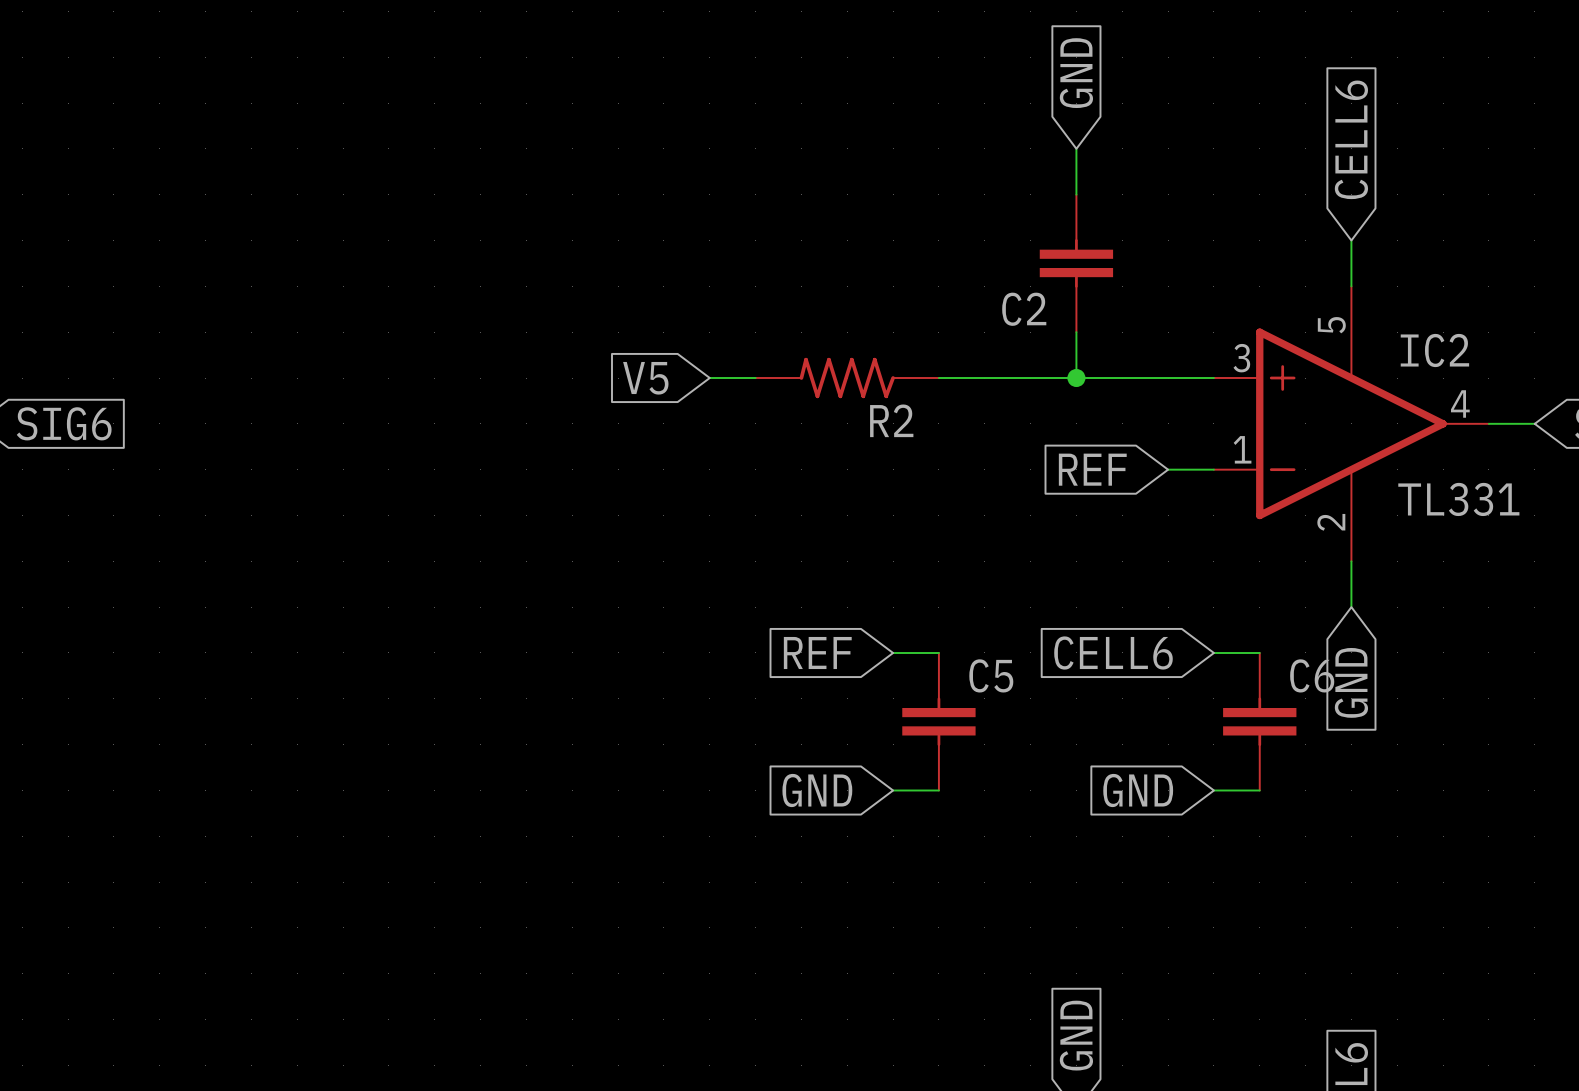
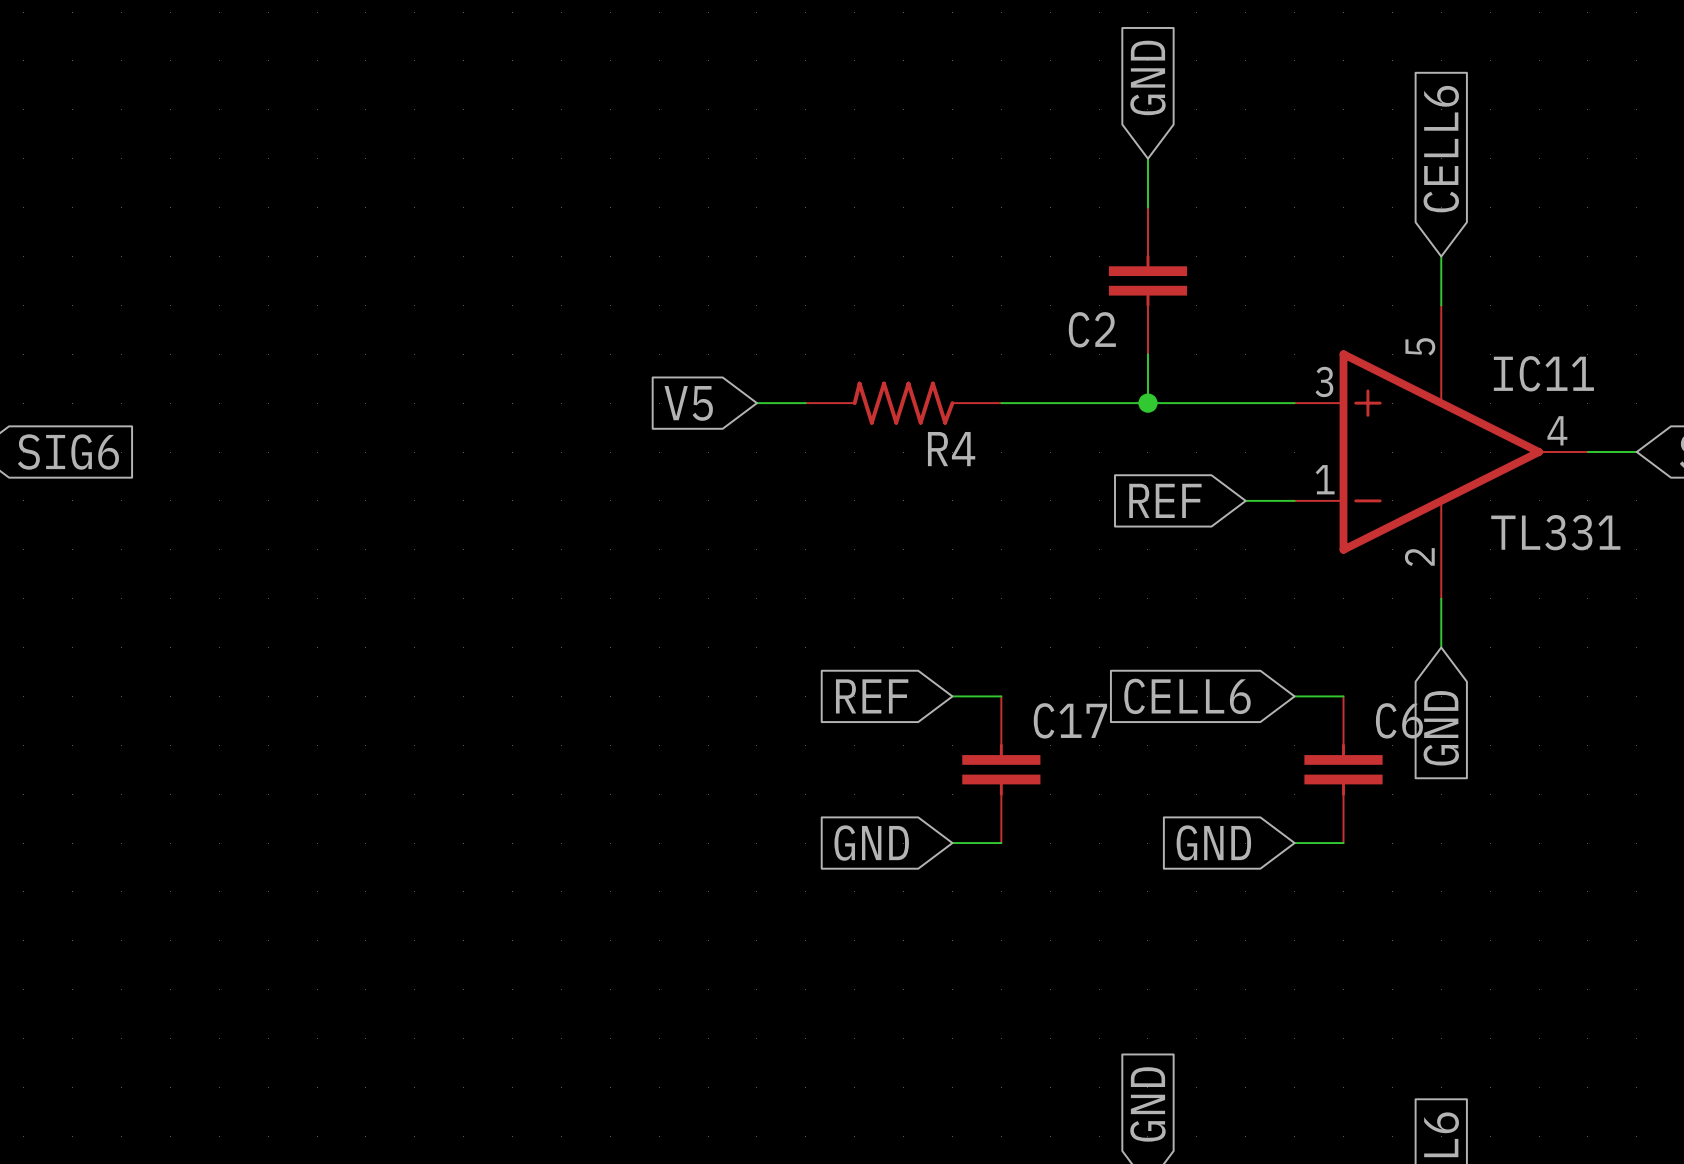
IC2 name: IC2 (1434, 350) -> IC11 (1543, 373)
R2 name: R2 (891, 420) -> R4 (951, 449)
C5 name: C5 (991, 675) -> C17 (1070, 720)

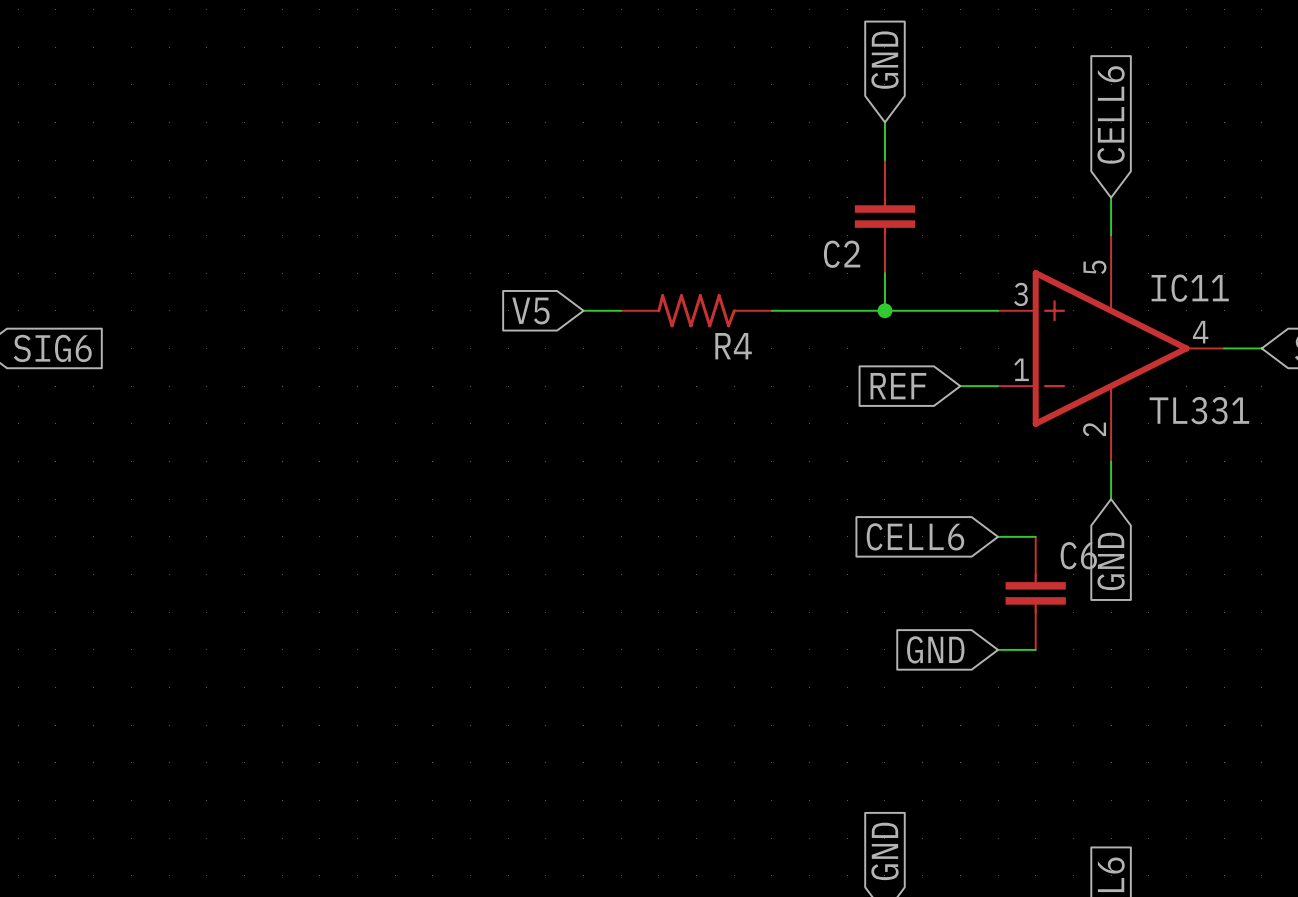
global label: REF (872, 696) -> none
wire: (952, 696) (1001, 696) -> none
C17: (1001, 769) -> none
global label: GND (871, 843) -> none
wire: (952, 843) (1001, 843) -> none

